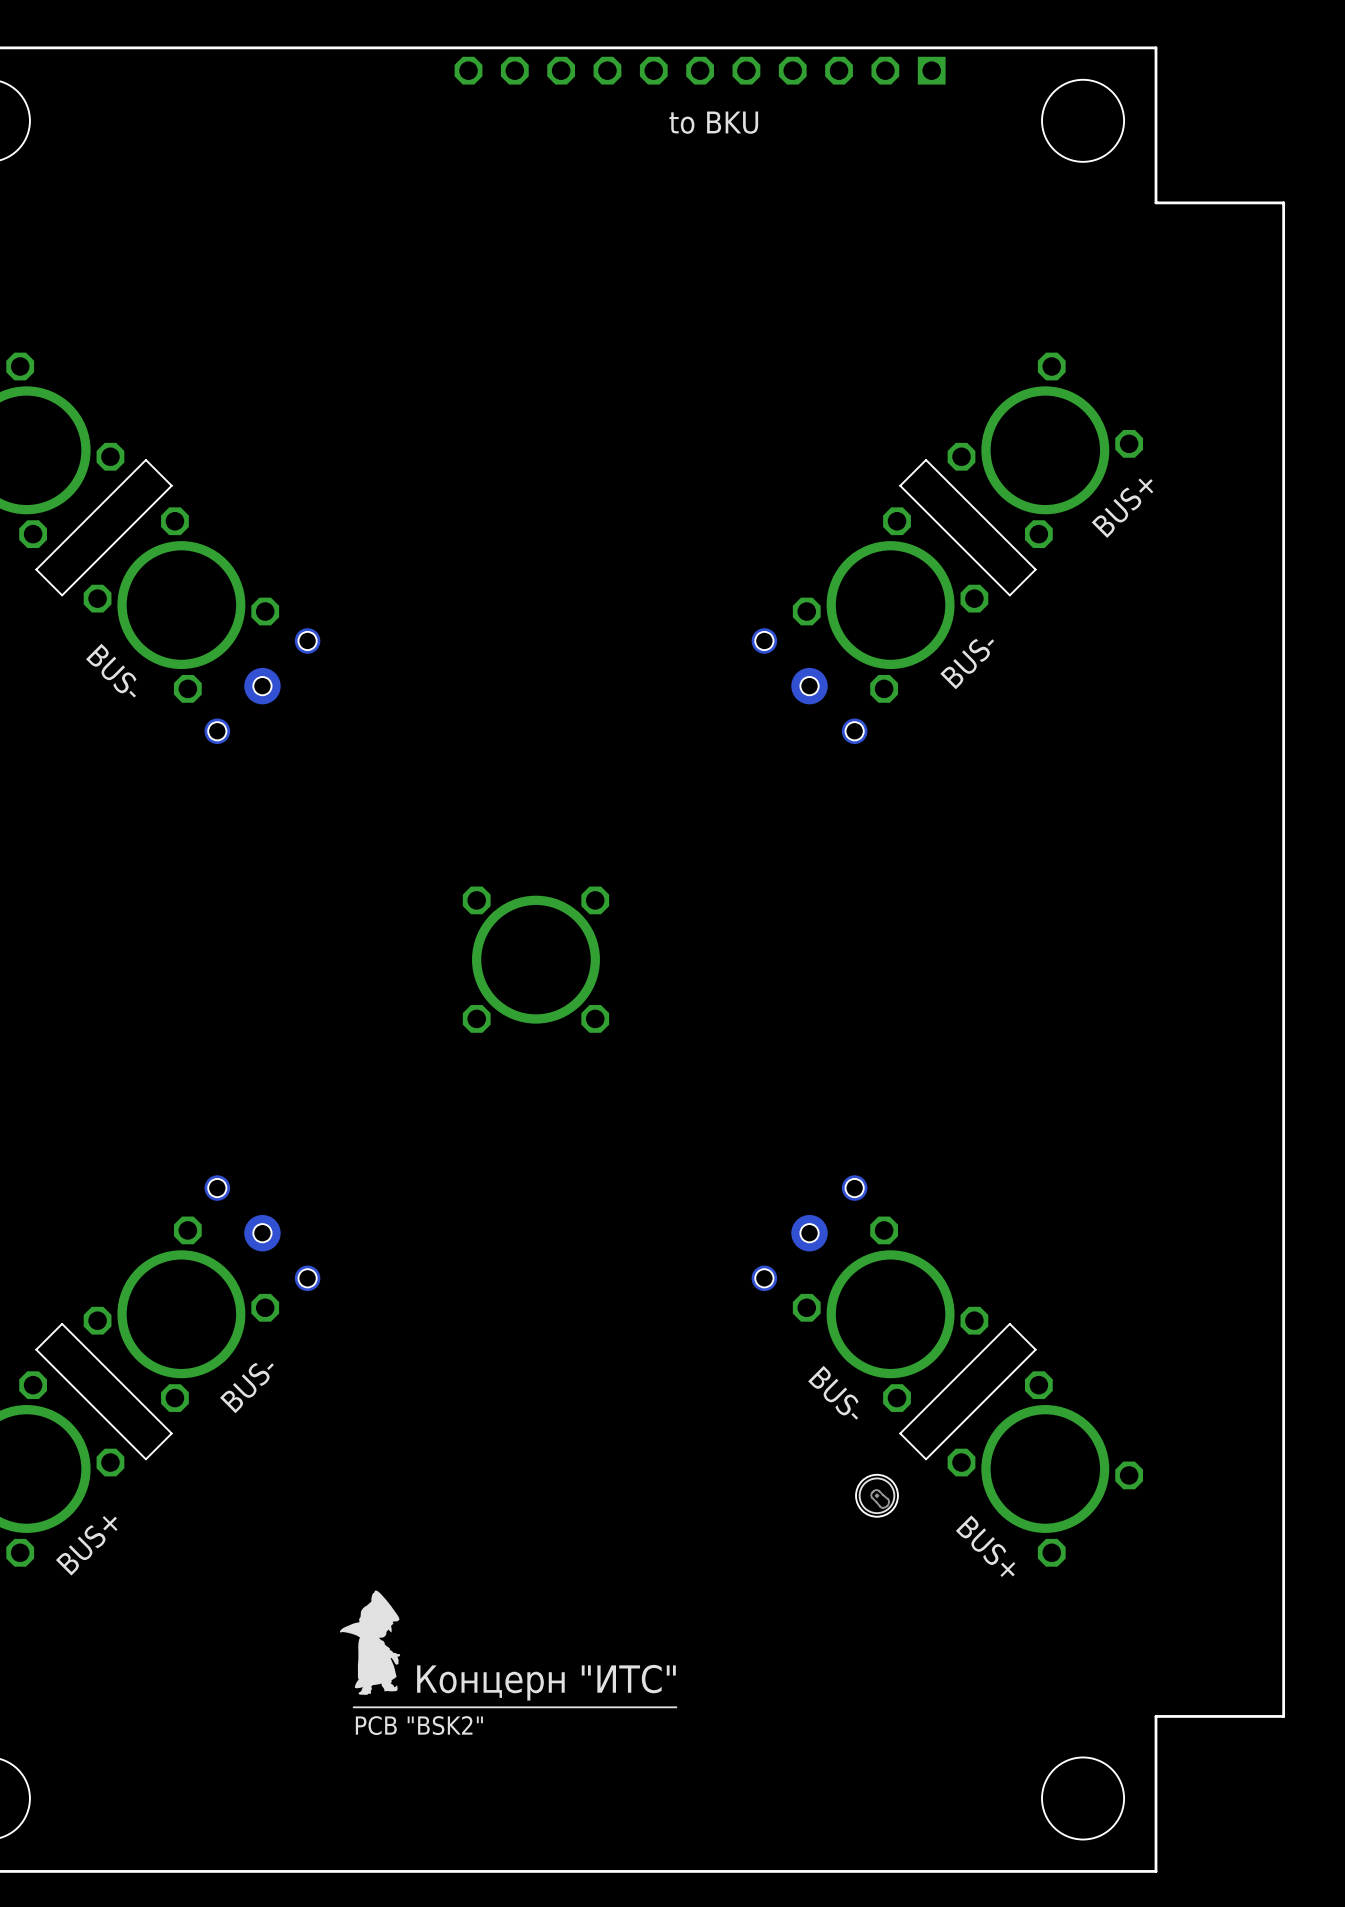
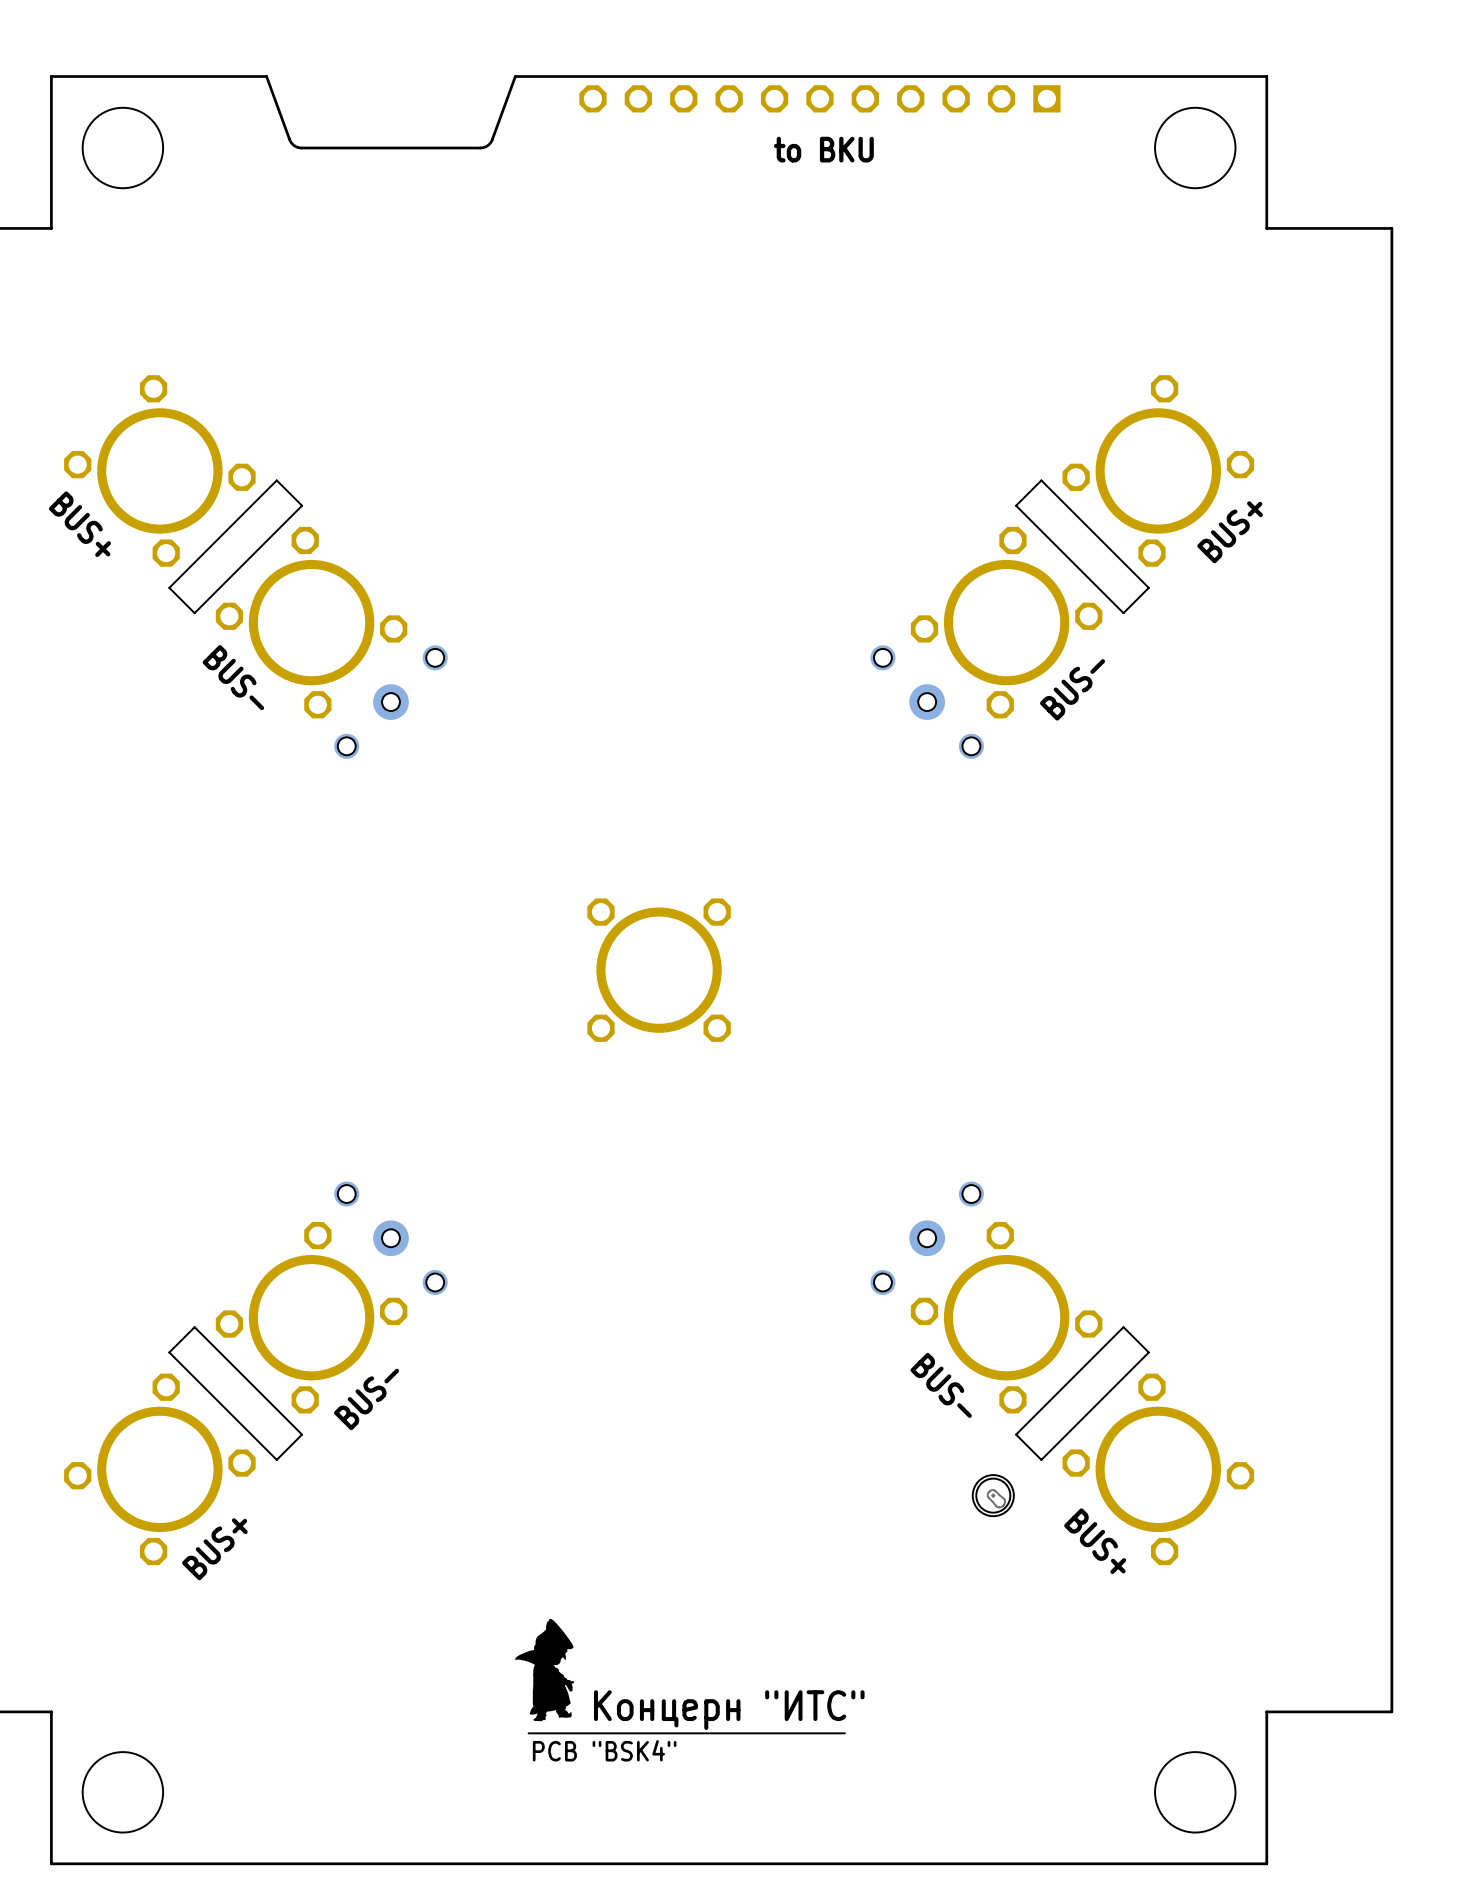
board edge: (389, 47) (135, 47) -> (515, 76) (491, 141) (486, 146) (480, 148) (297, 147) (289, 139) (266, 76)
drawing: [339, 1590, 678, 1709] -> none
drawing: none -> [515, 1618, 846, 1735]

